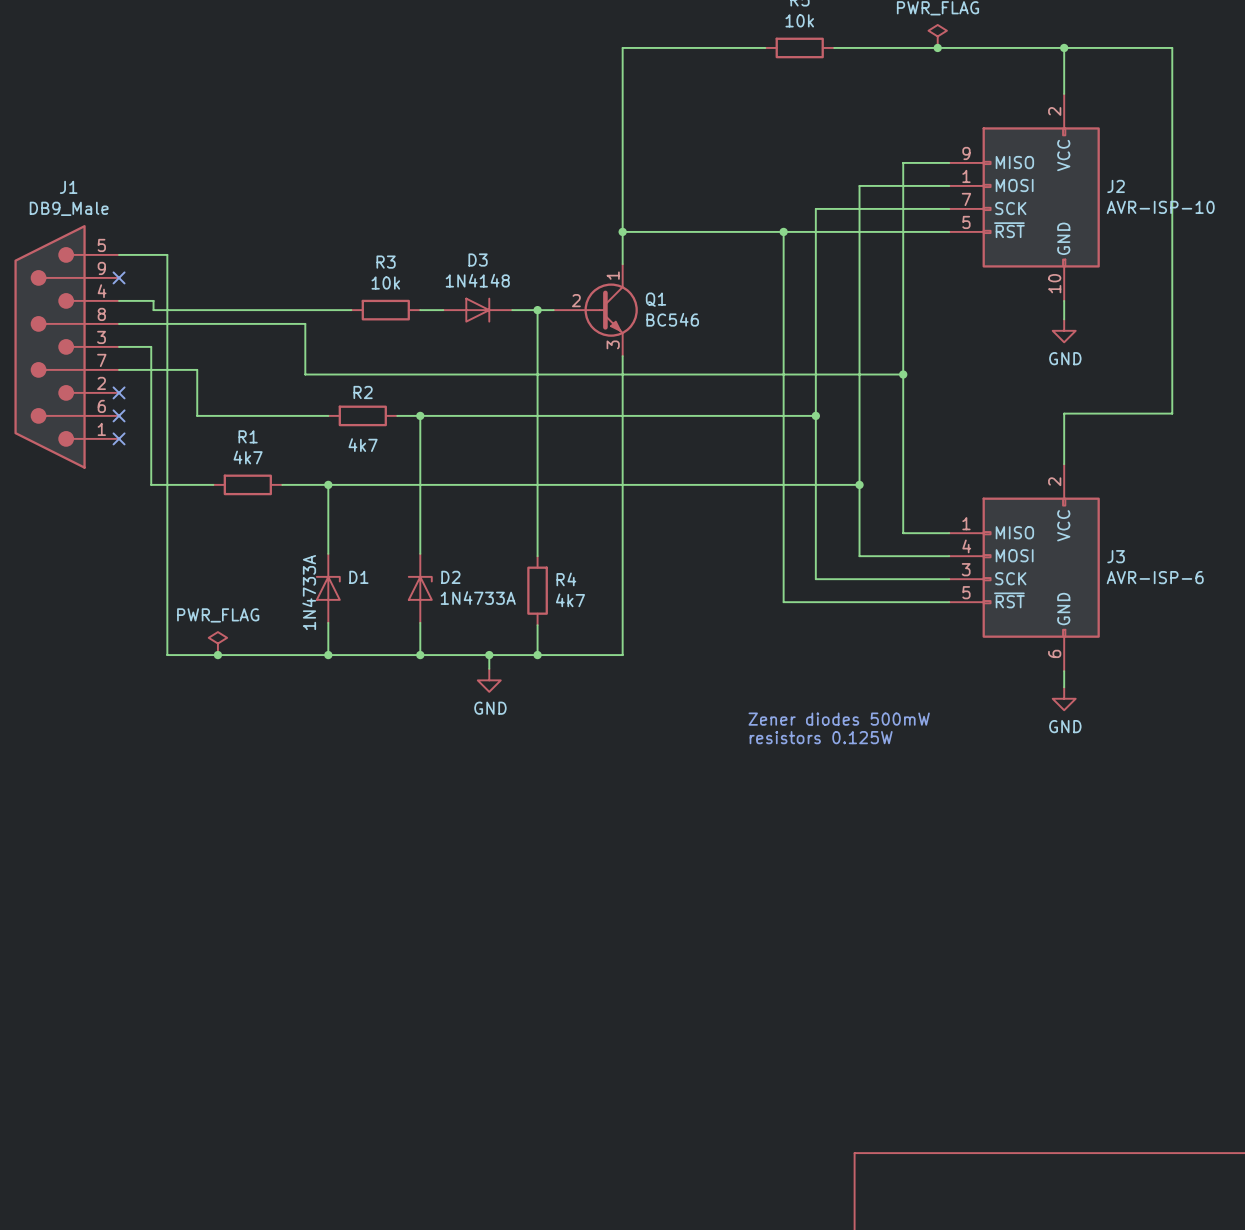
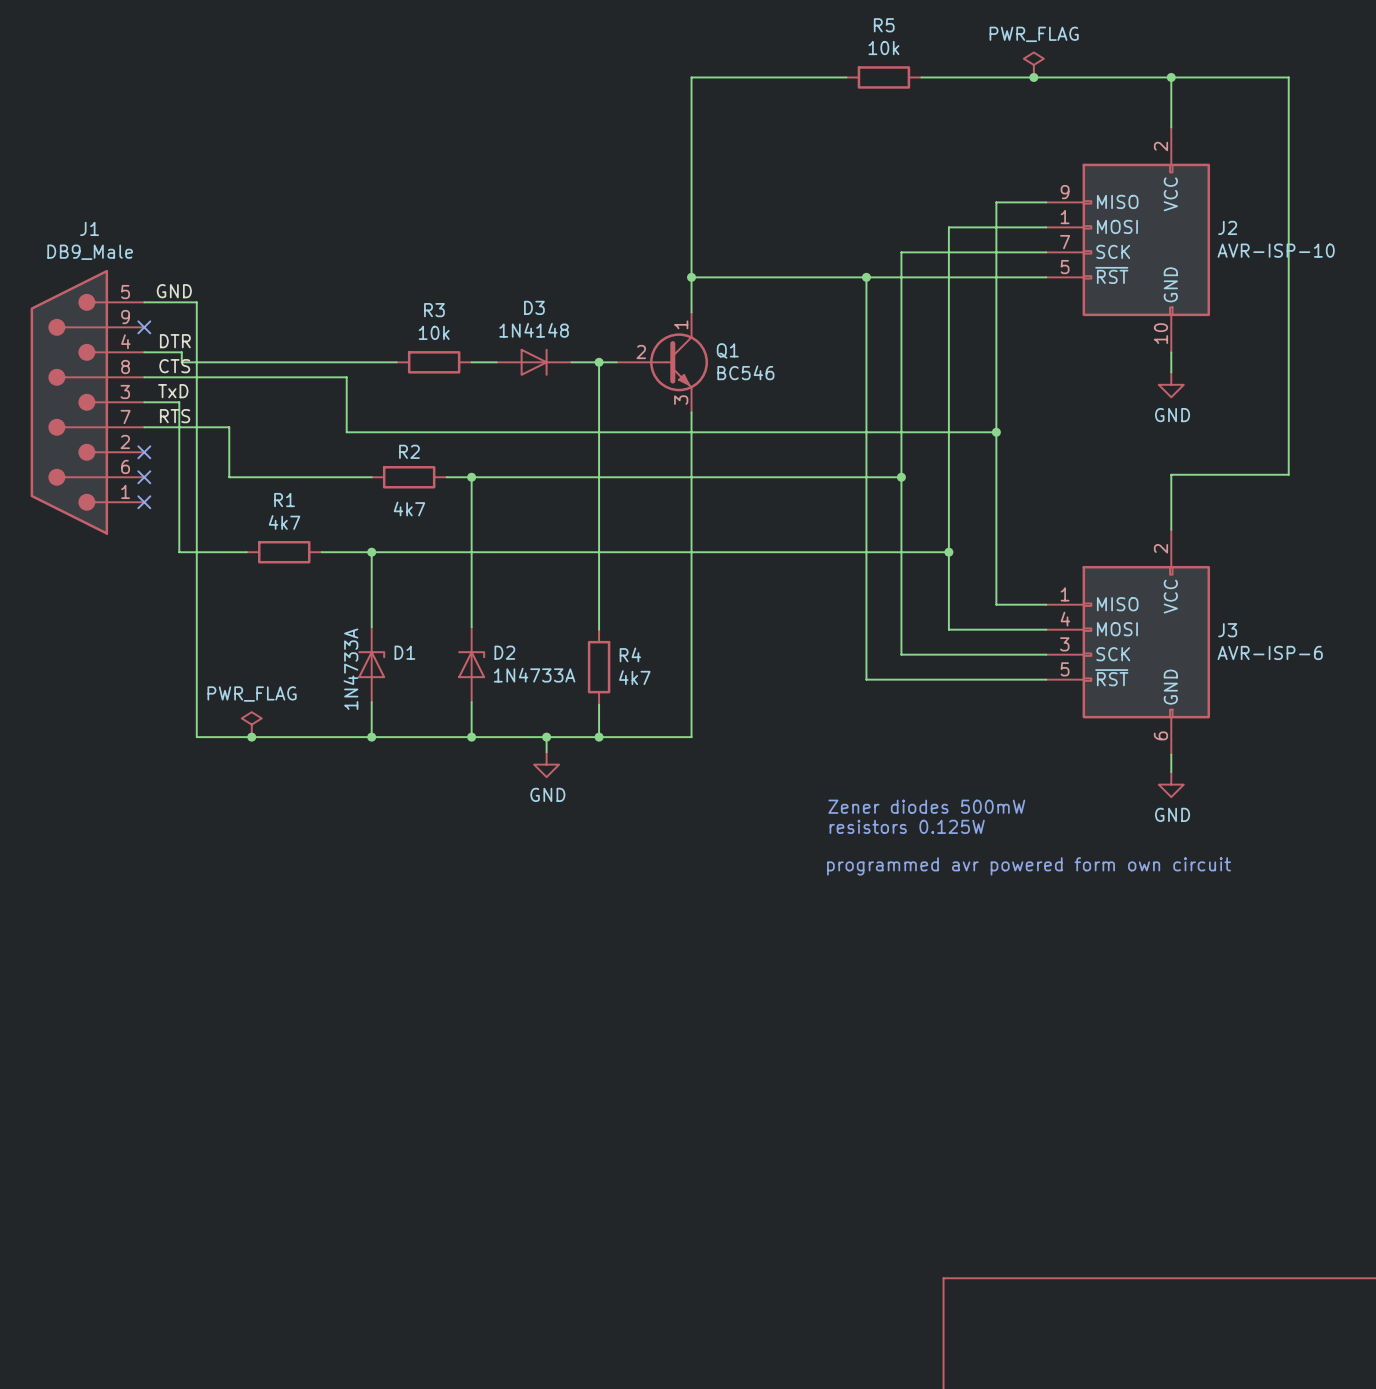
label: none -> GND (174, 291)
label: none -> DTR (175, 341)
label: none -> CTS (174, 366)
label: none -> TxD (173, 391)
label: none -> RTS (175, 416)
text: none -> programmed avr powered form own circuit (1029, 866)

